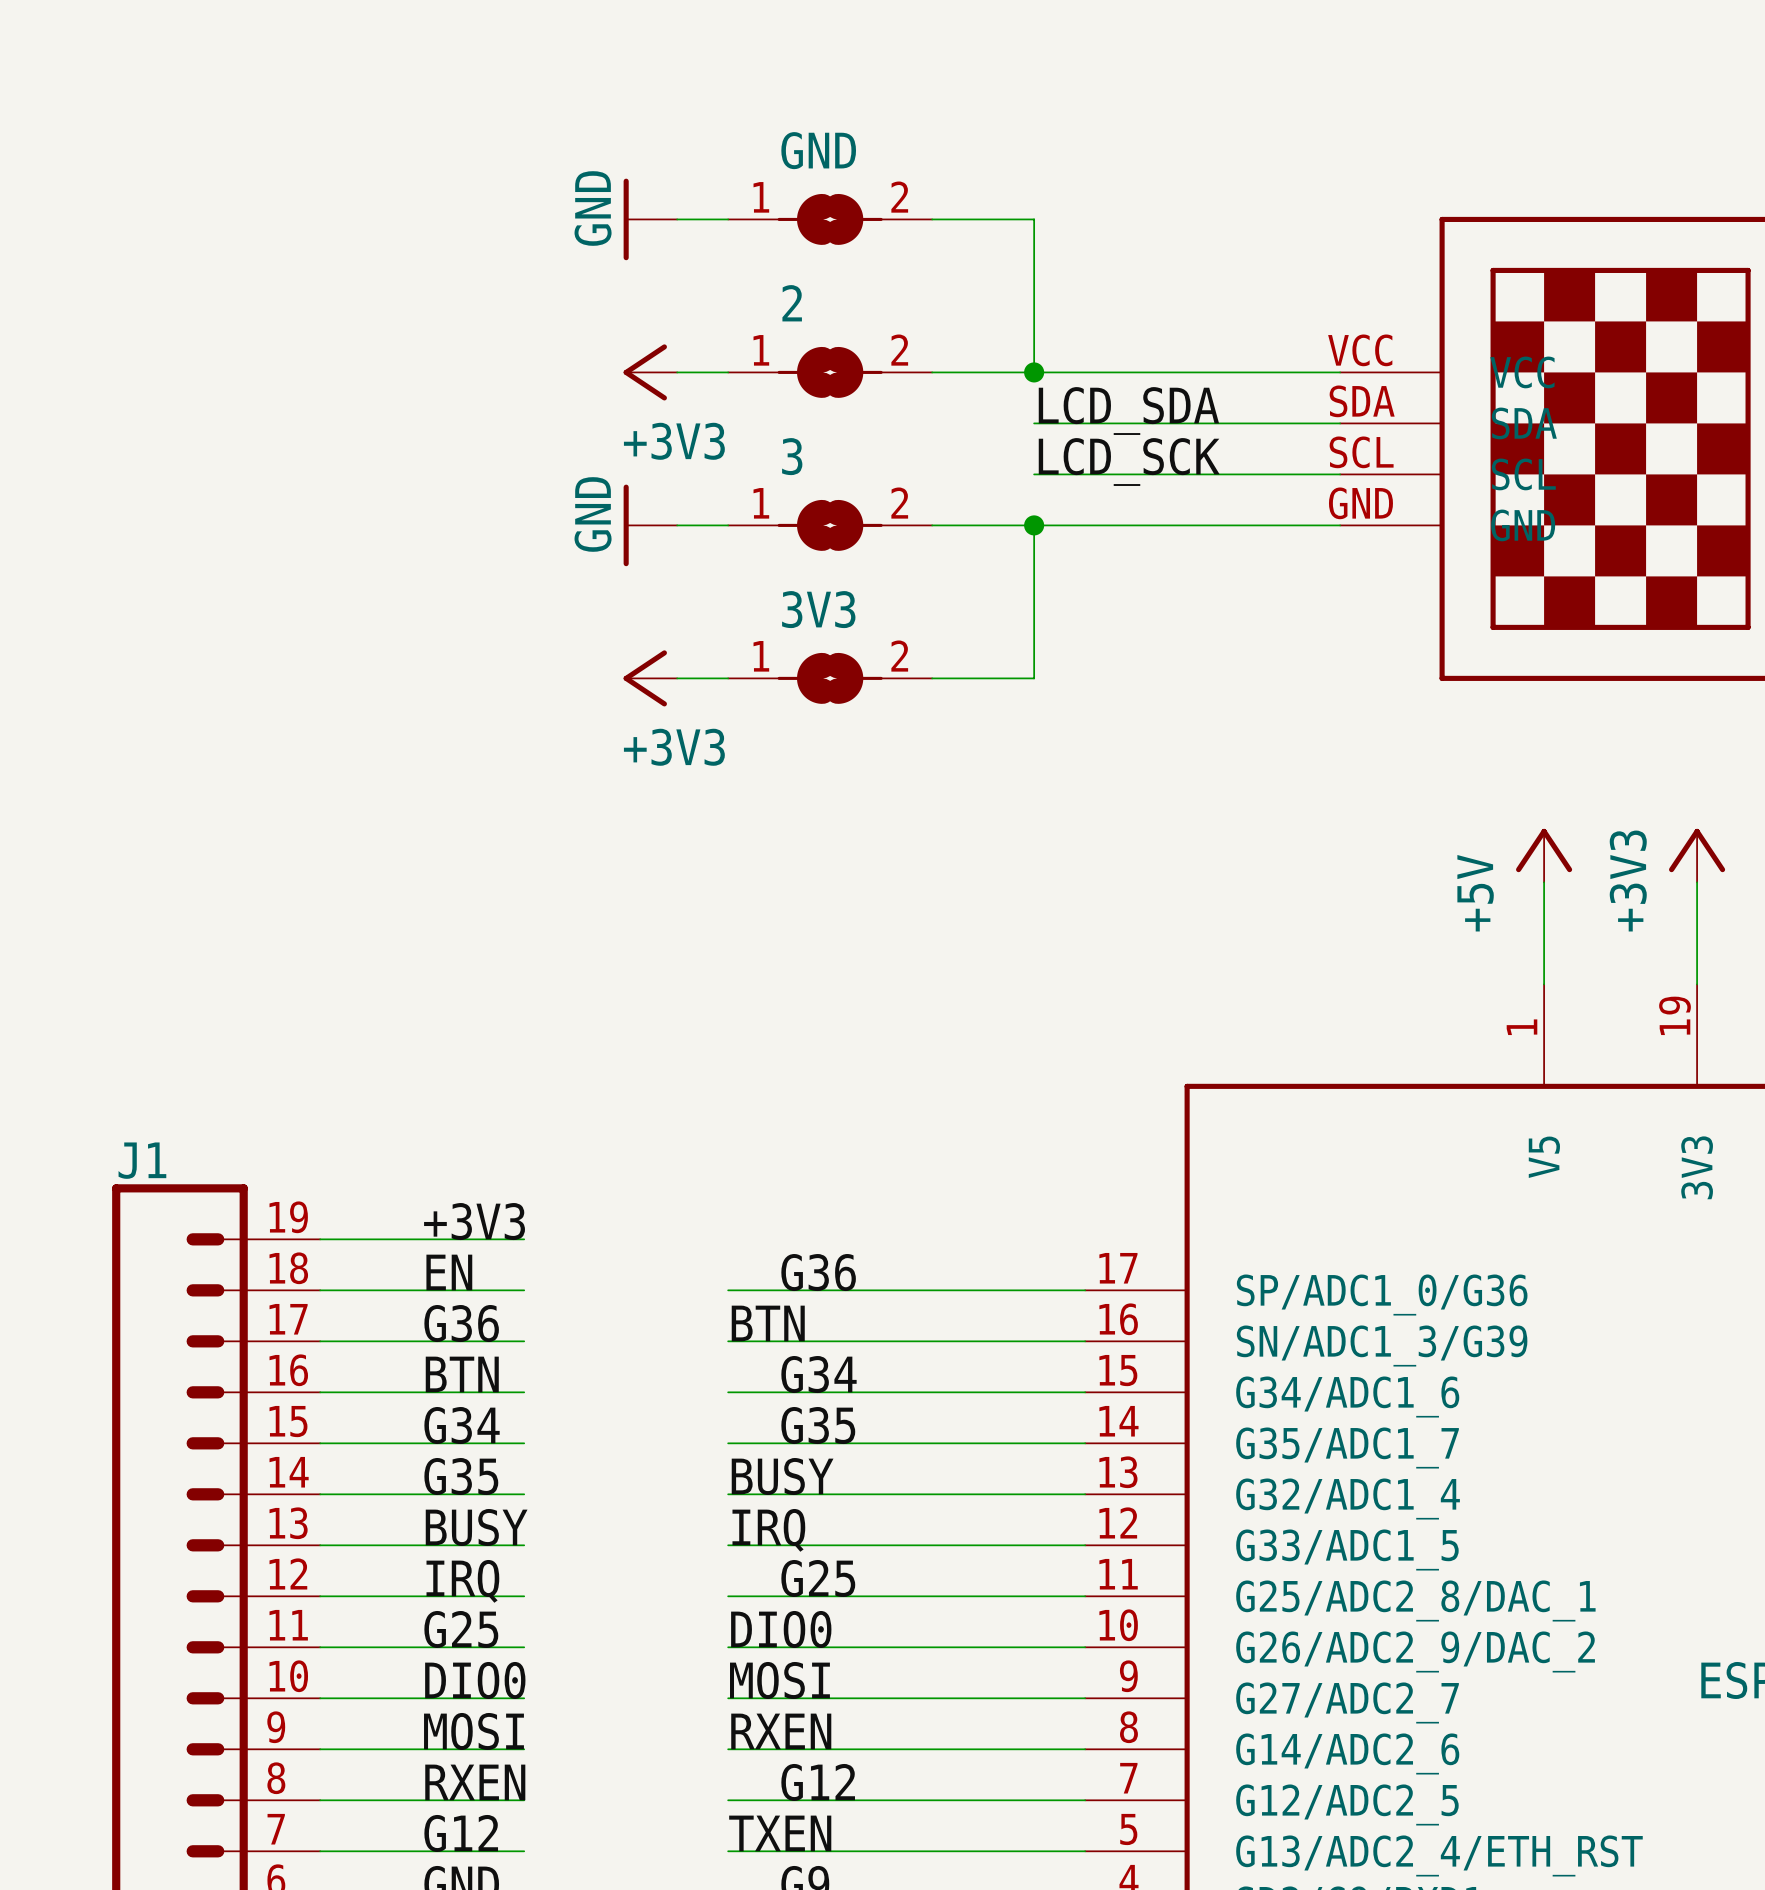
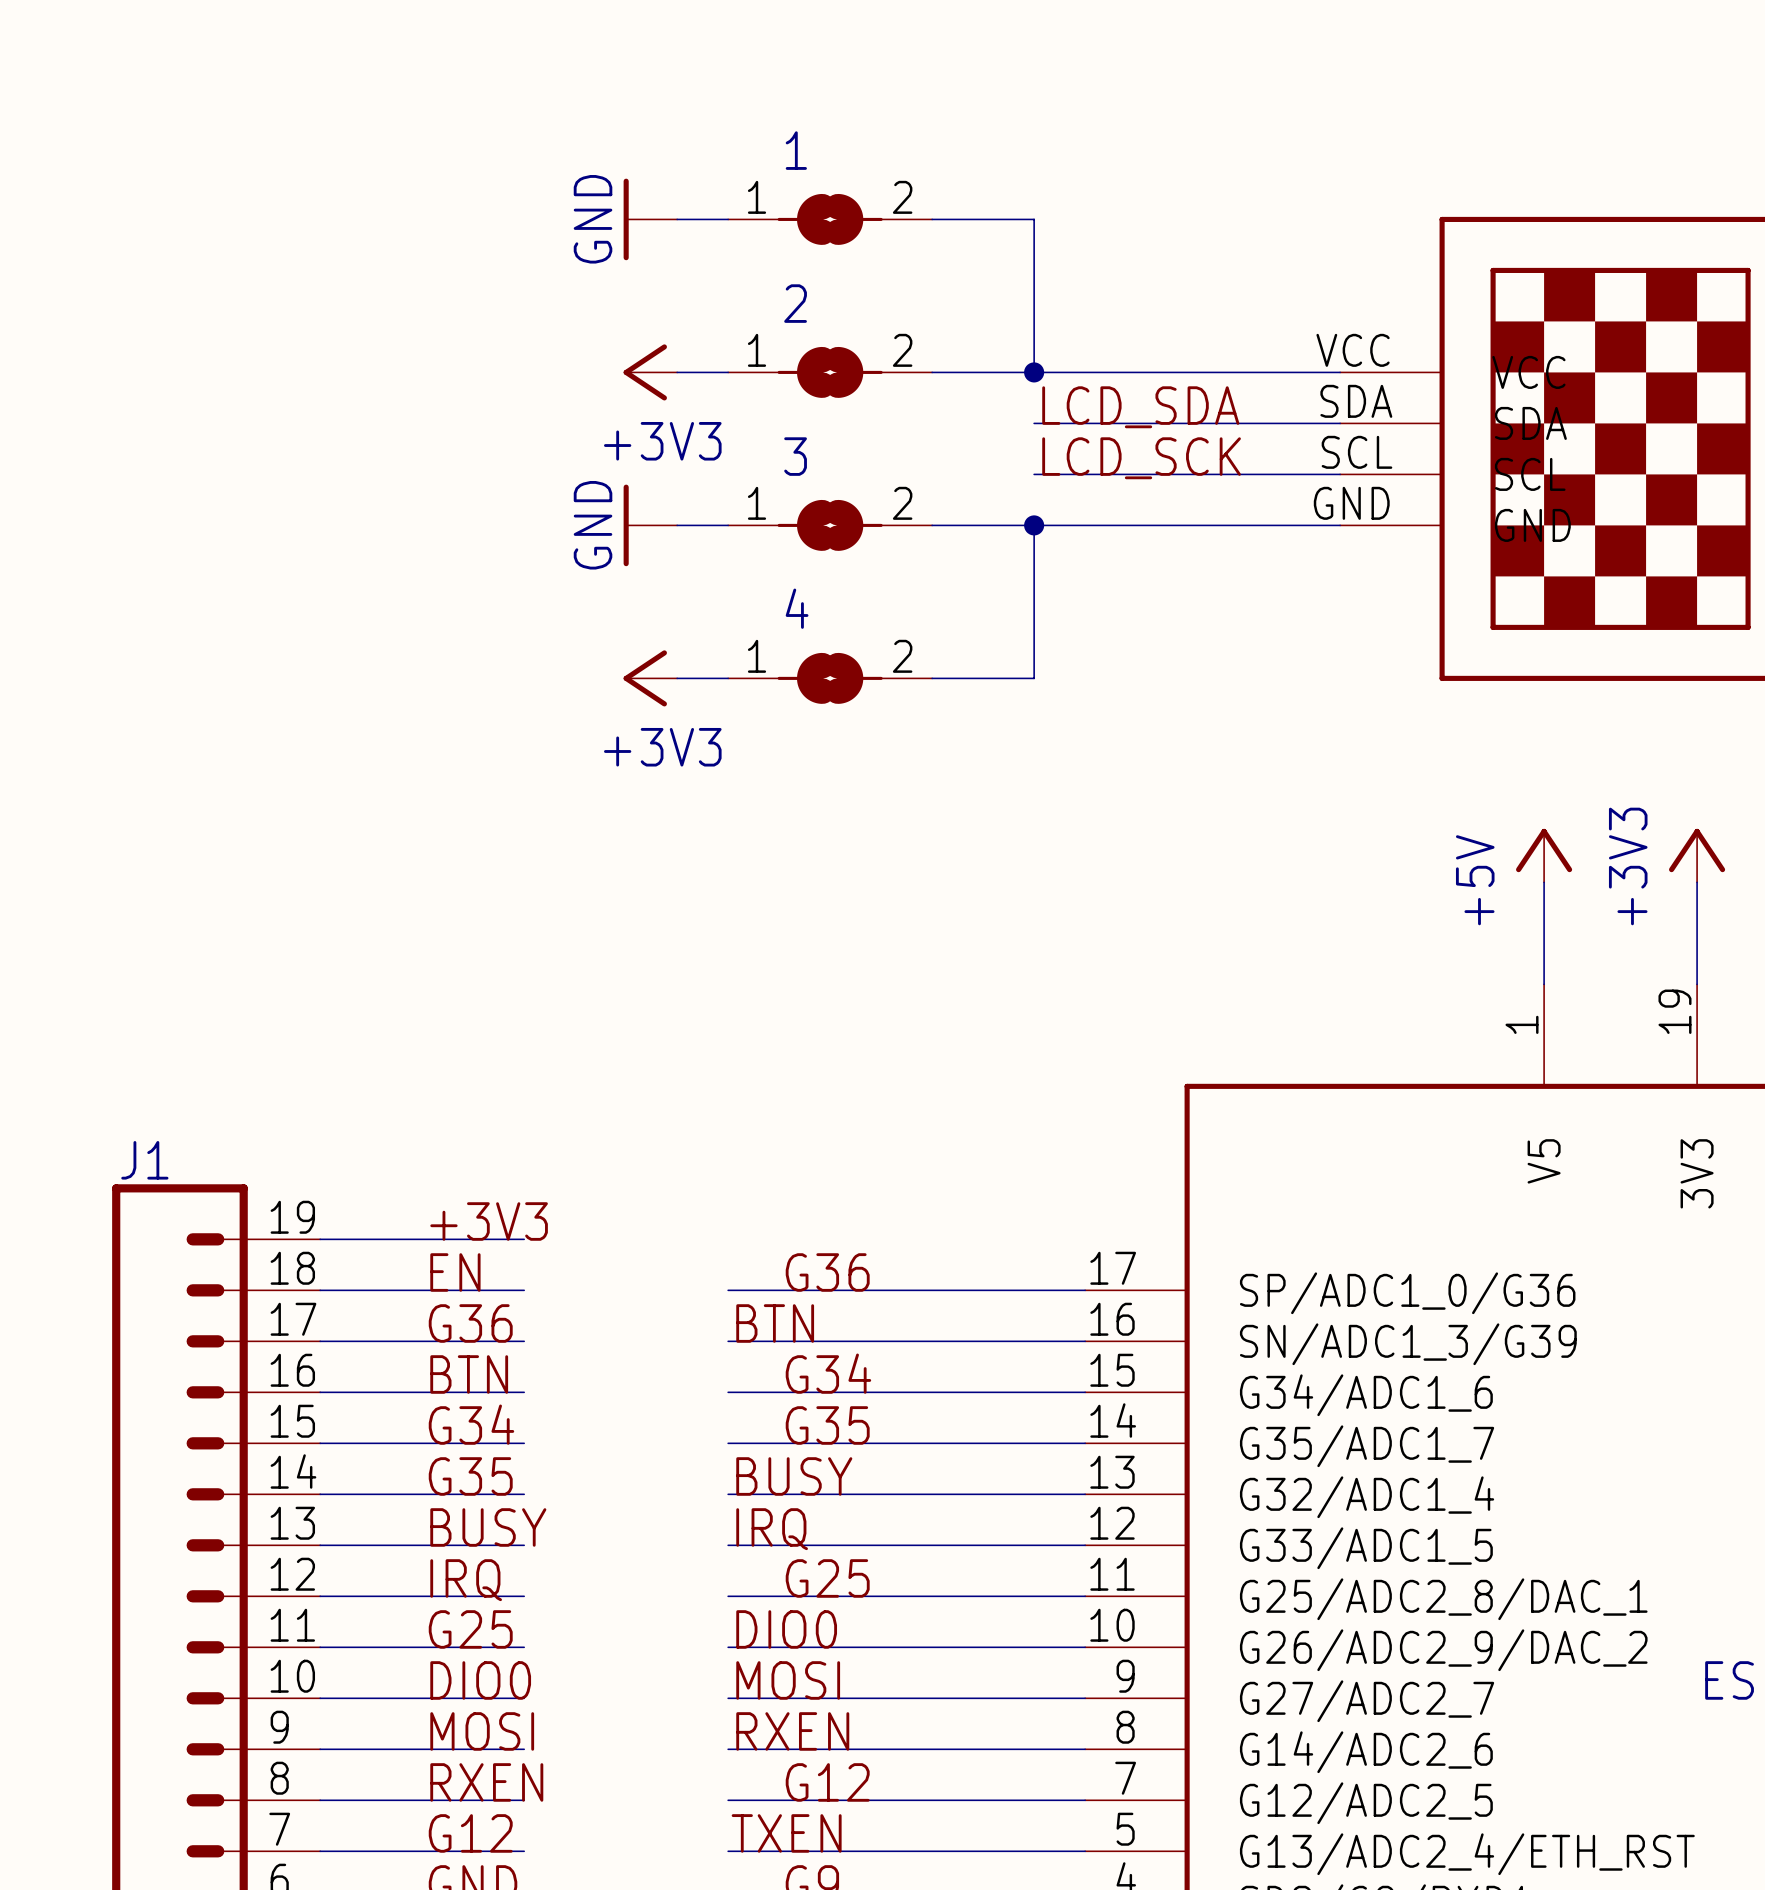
GND name: GND (818, 150) -> 1 (796, 150)
3V3 name: 3V3 (818, 609) -> 4 (797, 608)

